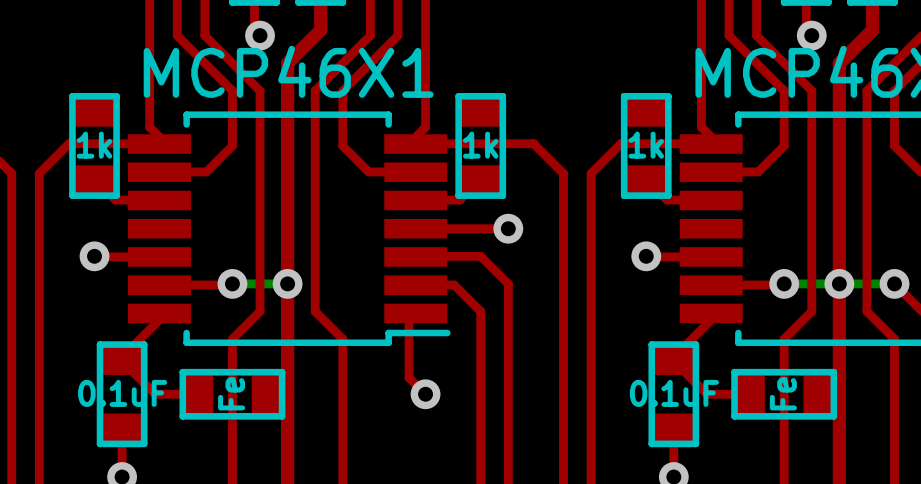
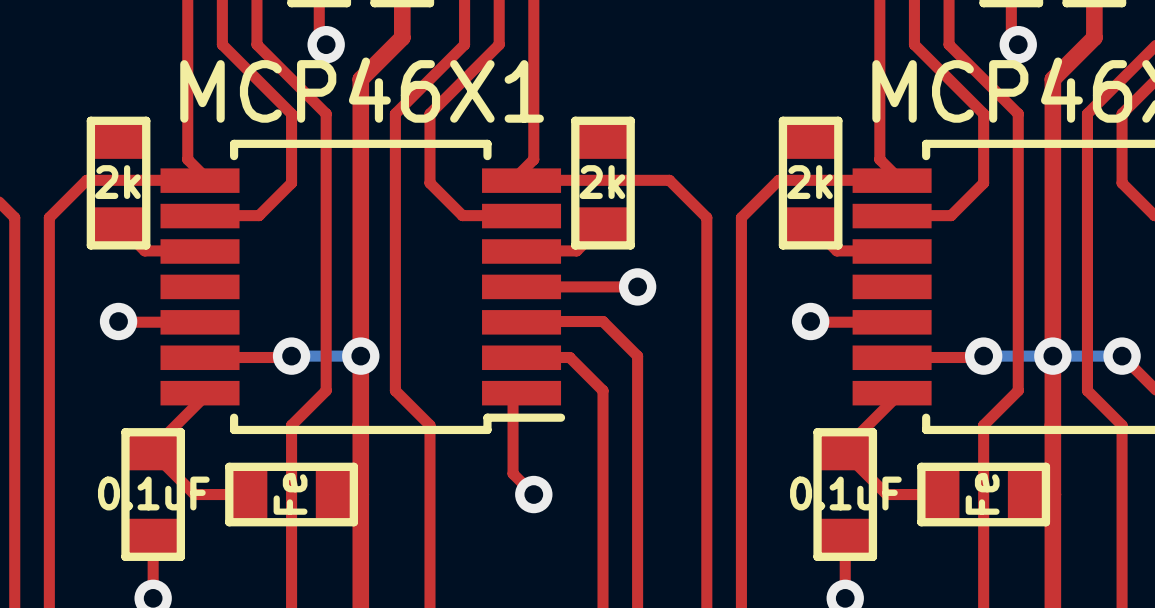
part value: 1k (94, 145) -> 2k (117, 182)
part value: 1k (480, 145) -> 2k (602, 182)
part value: 1k (646, 145) -> 2k (809, 182)

